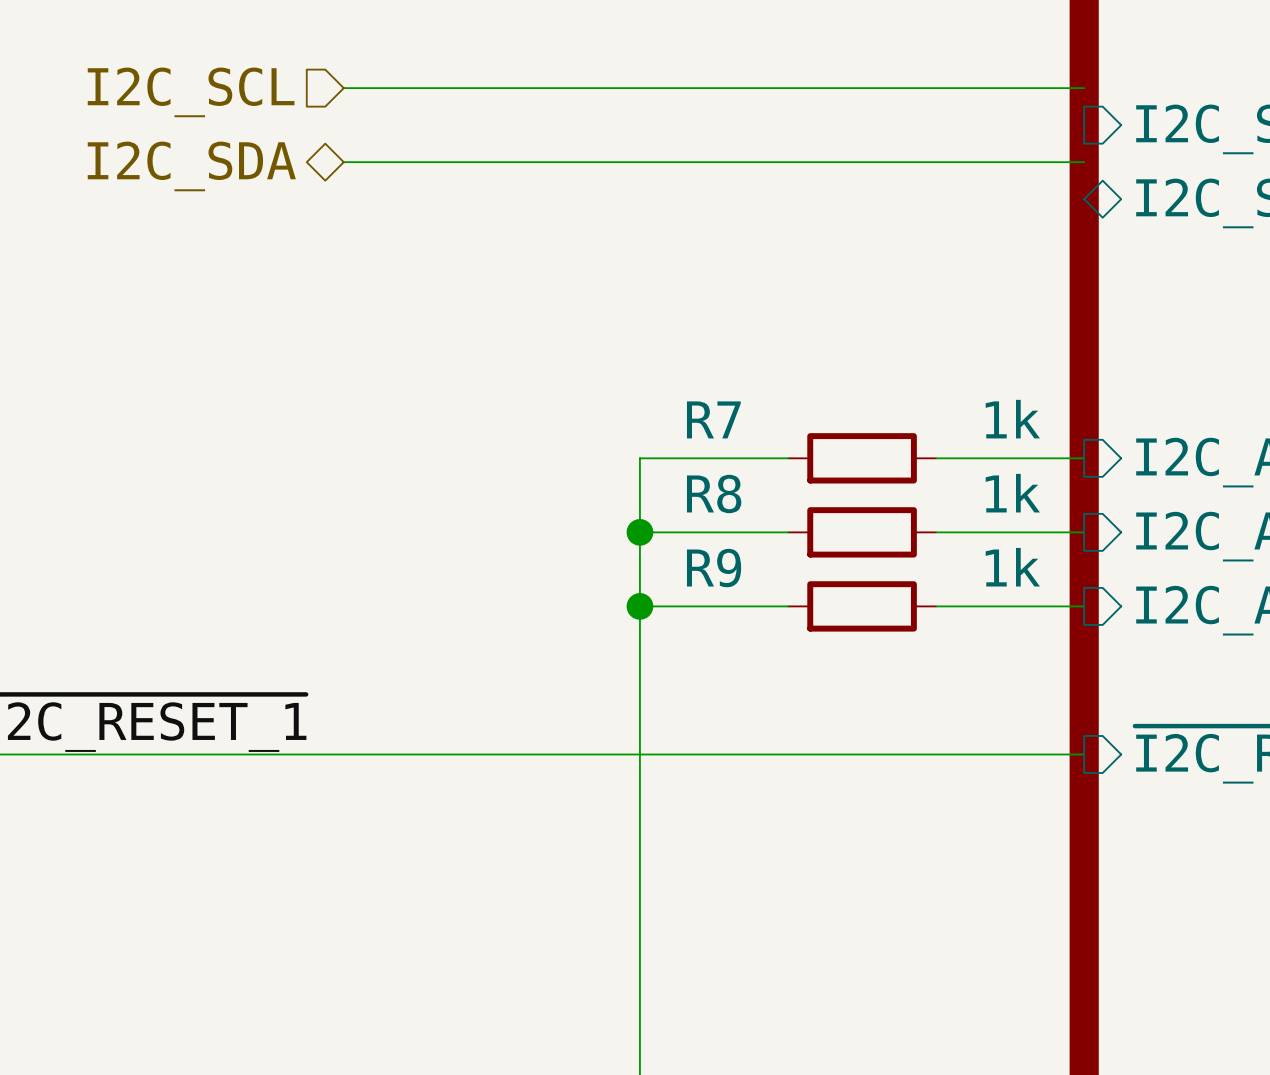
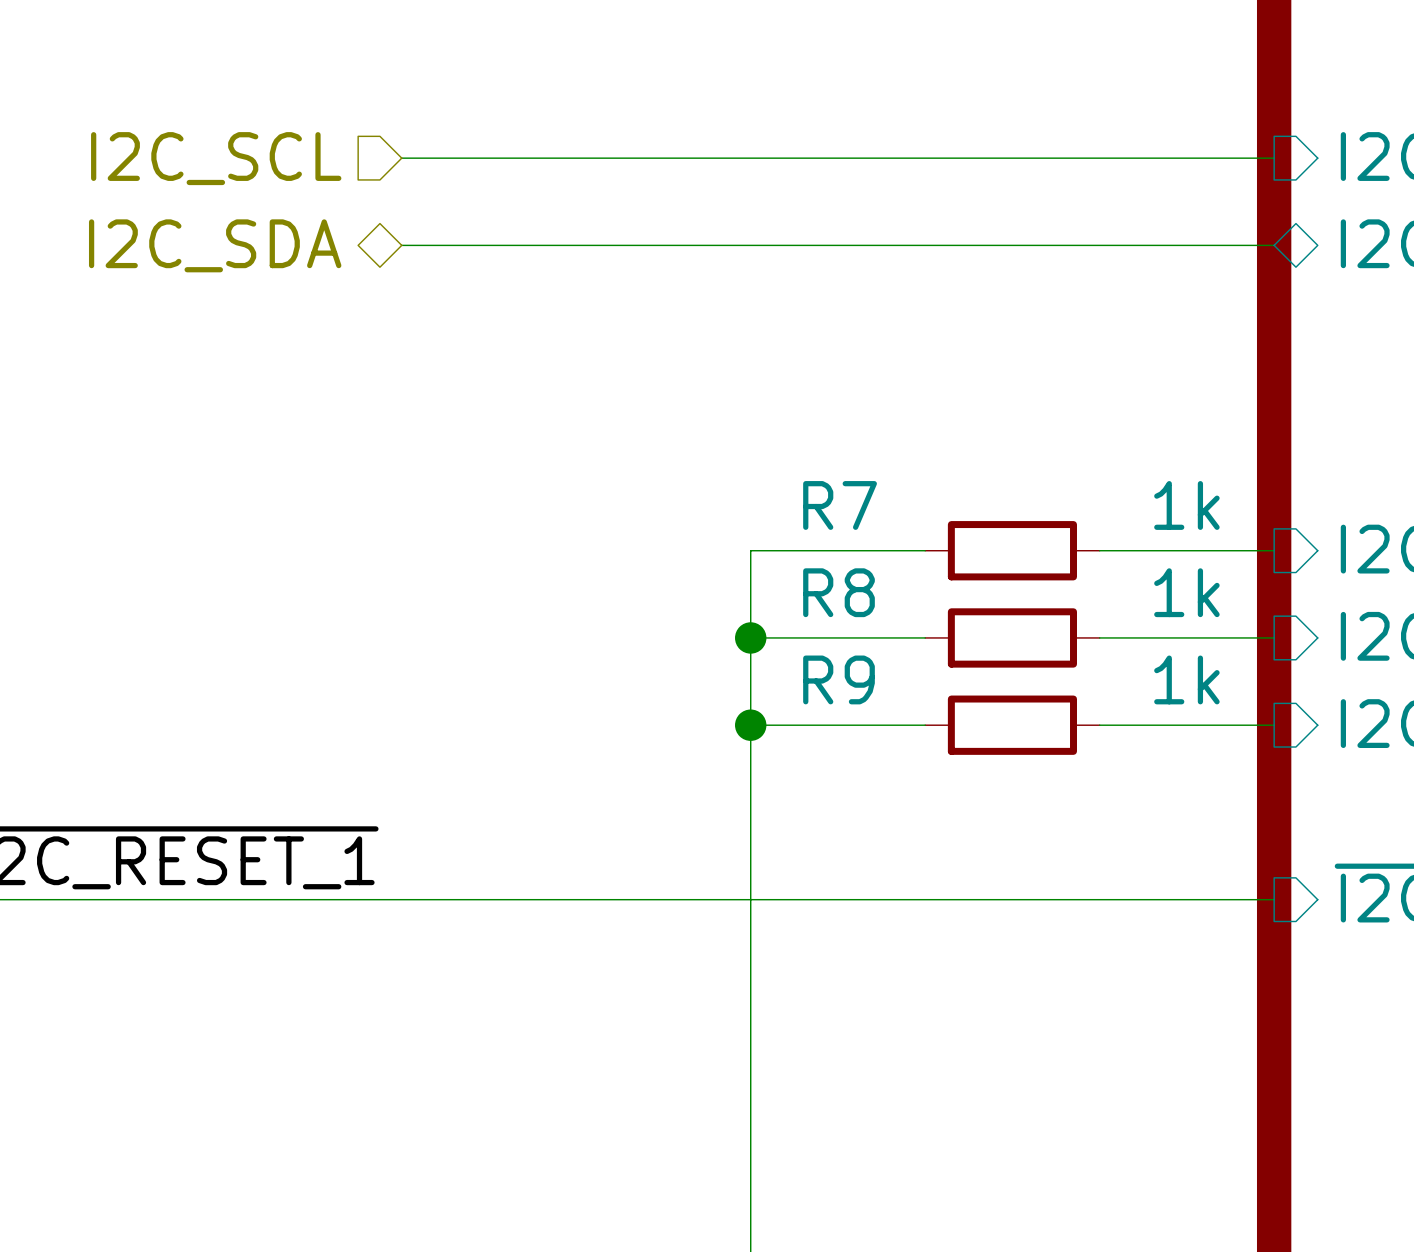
wire: (343, 88) (1084, 88) -> (401, 158) (1274, 158)
hierarchical label position: I2C_SCL (191, 92) -> I2C_SCL (216, 158)
wire: (343, 162) (1084, 162) -> (401, 245) (1274, 245)
hierarchical label position: I2C_SDA (191, 166) -> I2C_SDA (215, 245)

